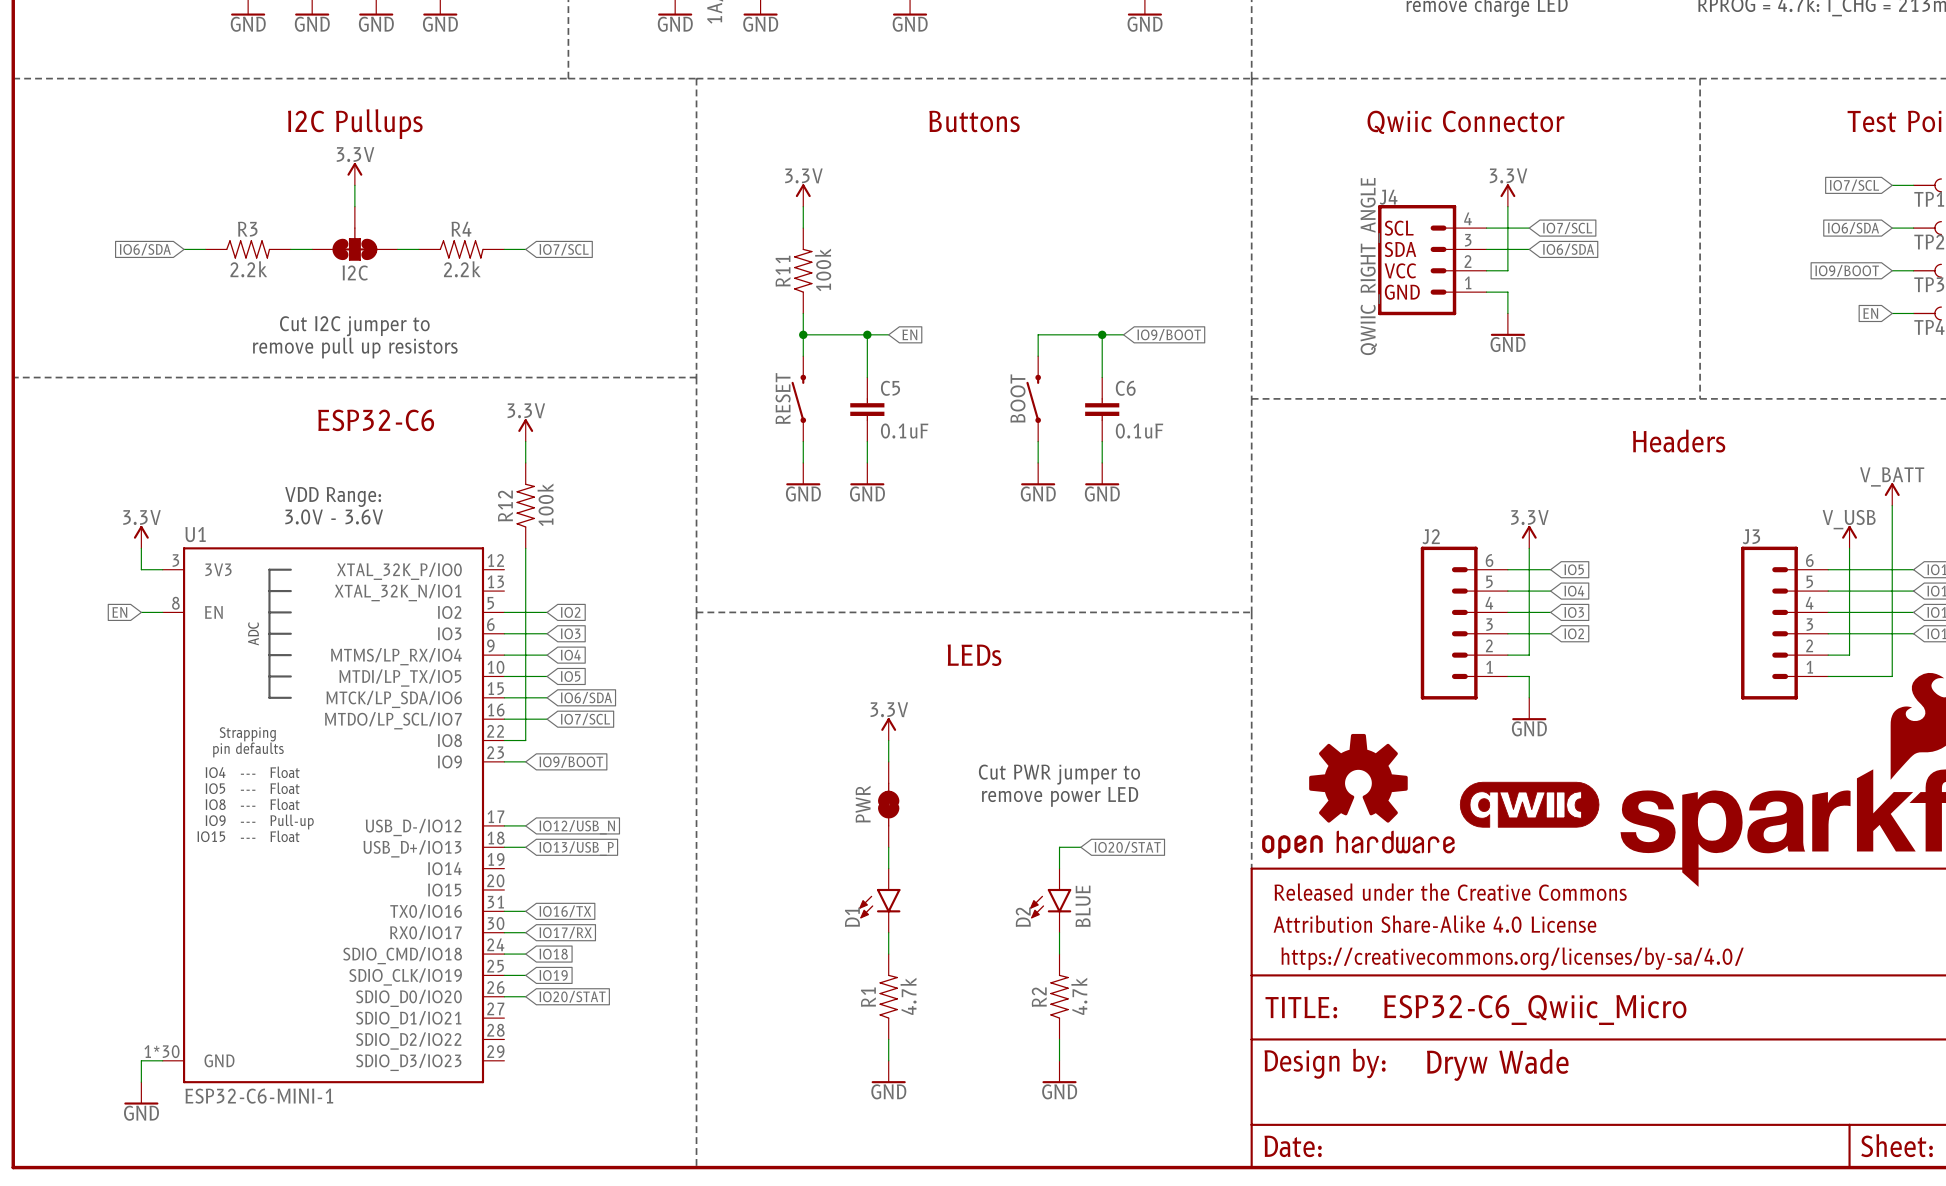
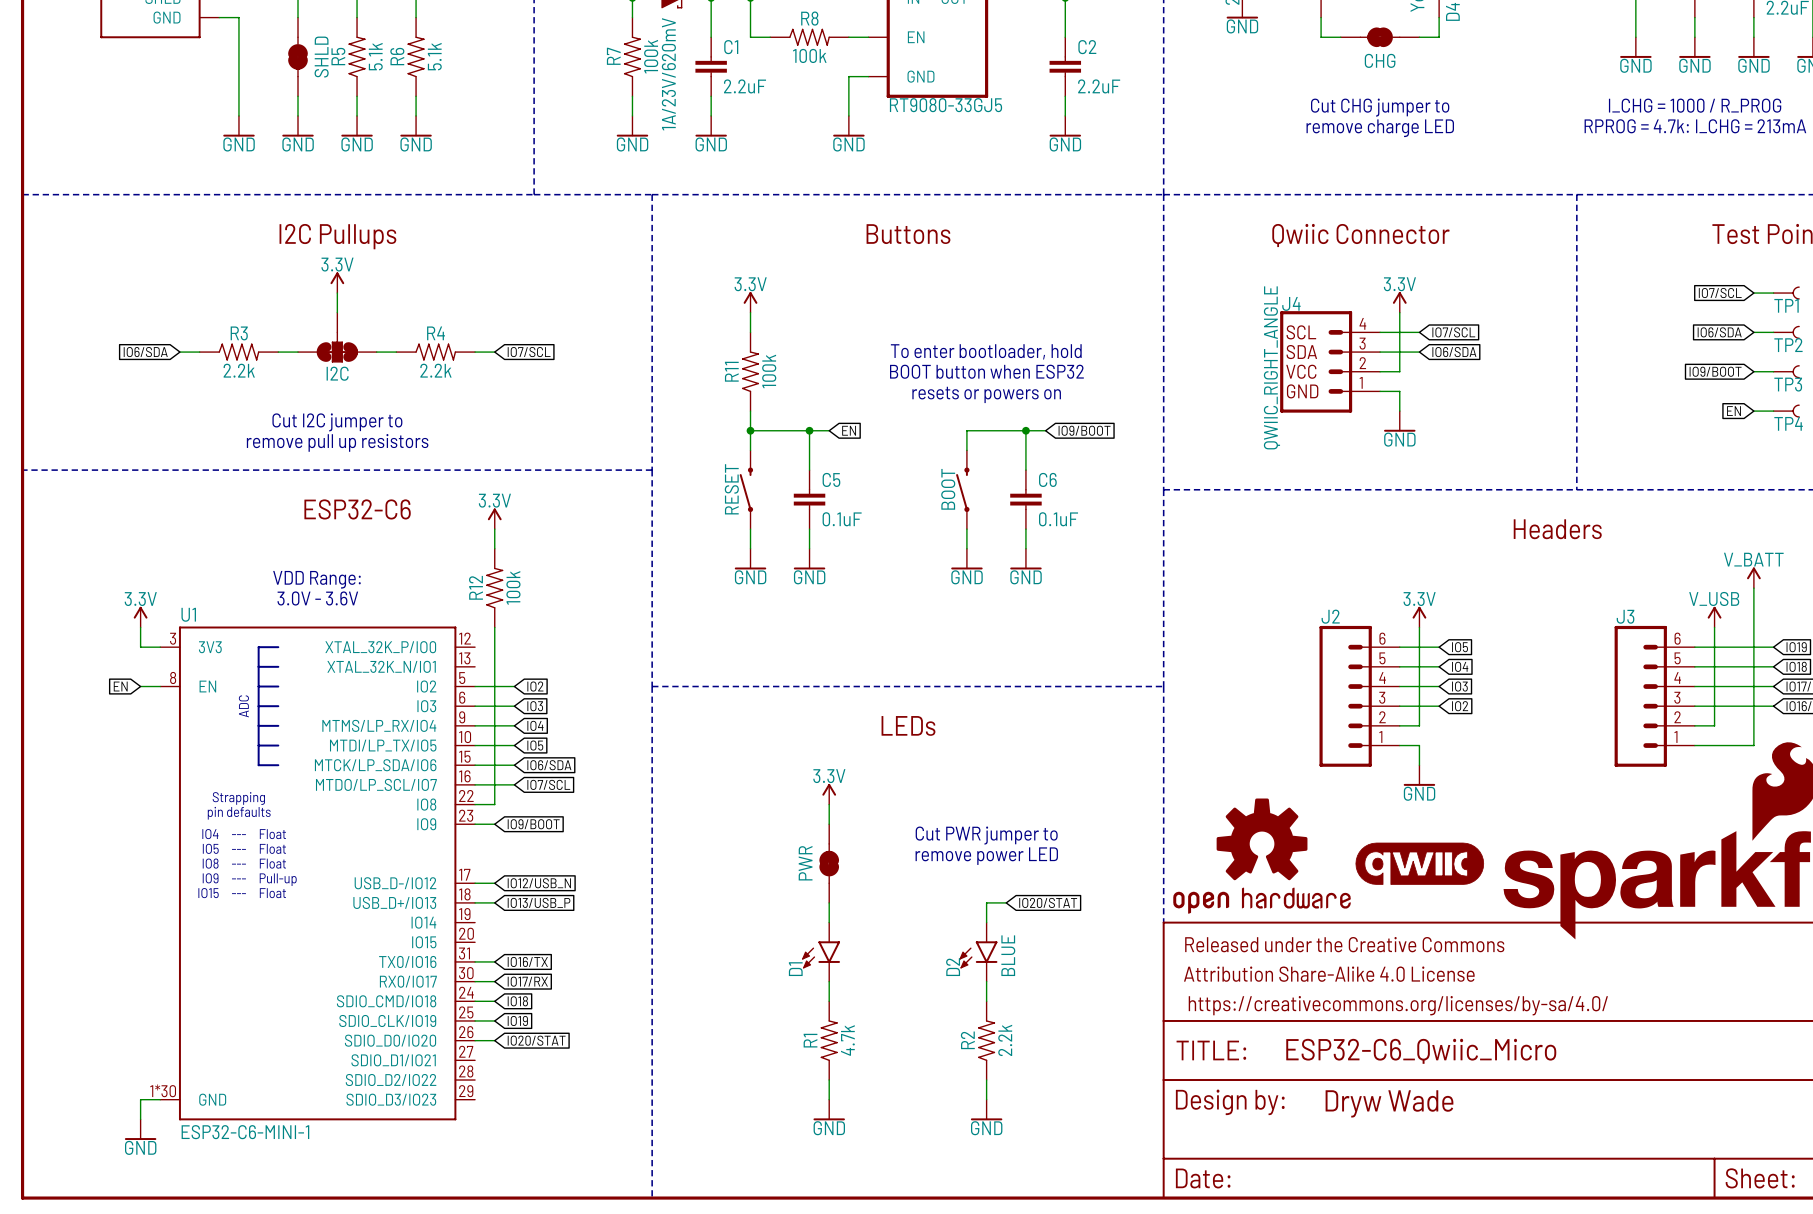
text: none -> To enter bootloader, hold (986, 351)
text: none -> BOOT button when ESP32 (986, 371)
text: none -> resets or powers on (986, 394)
R2 value: 4.7k (1079, 996) -> 2.2k (1005, 1040)

